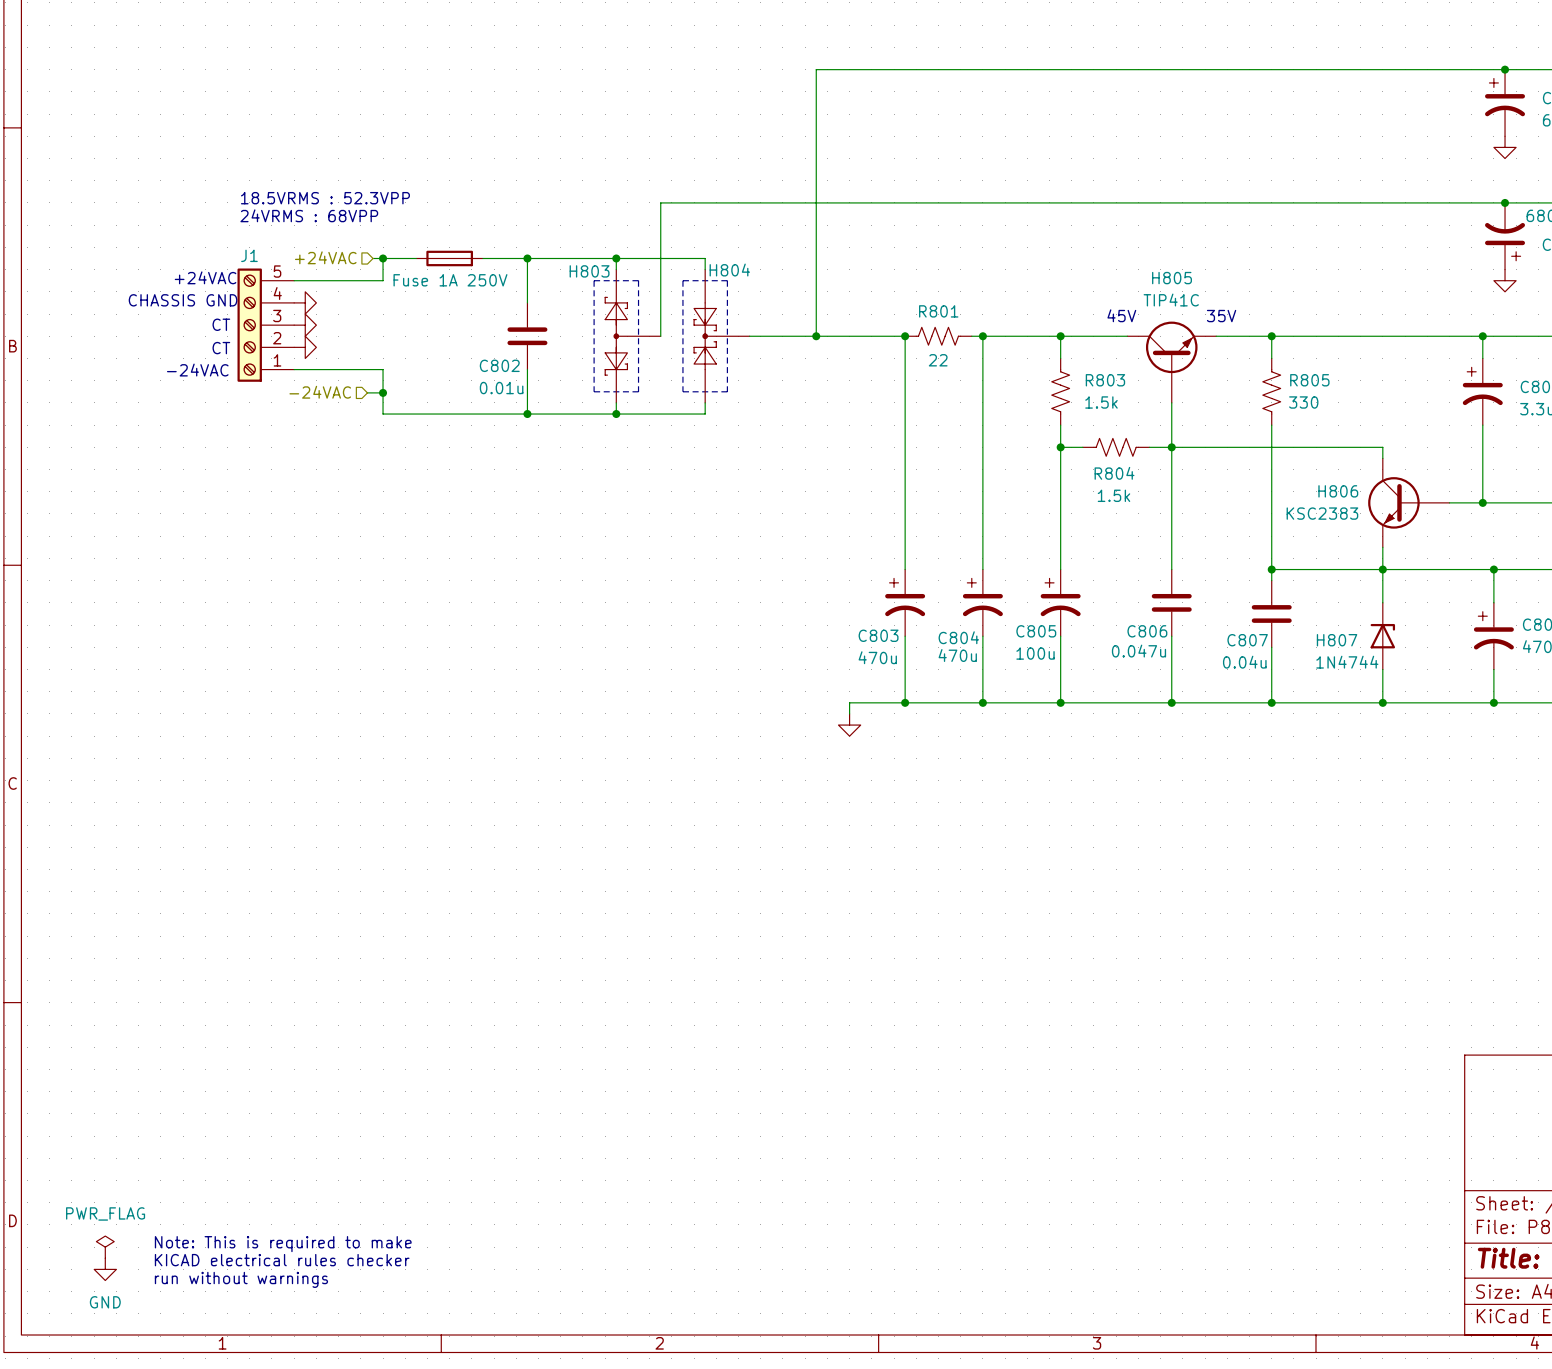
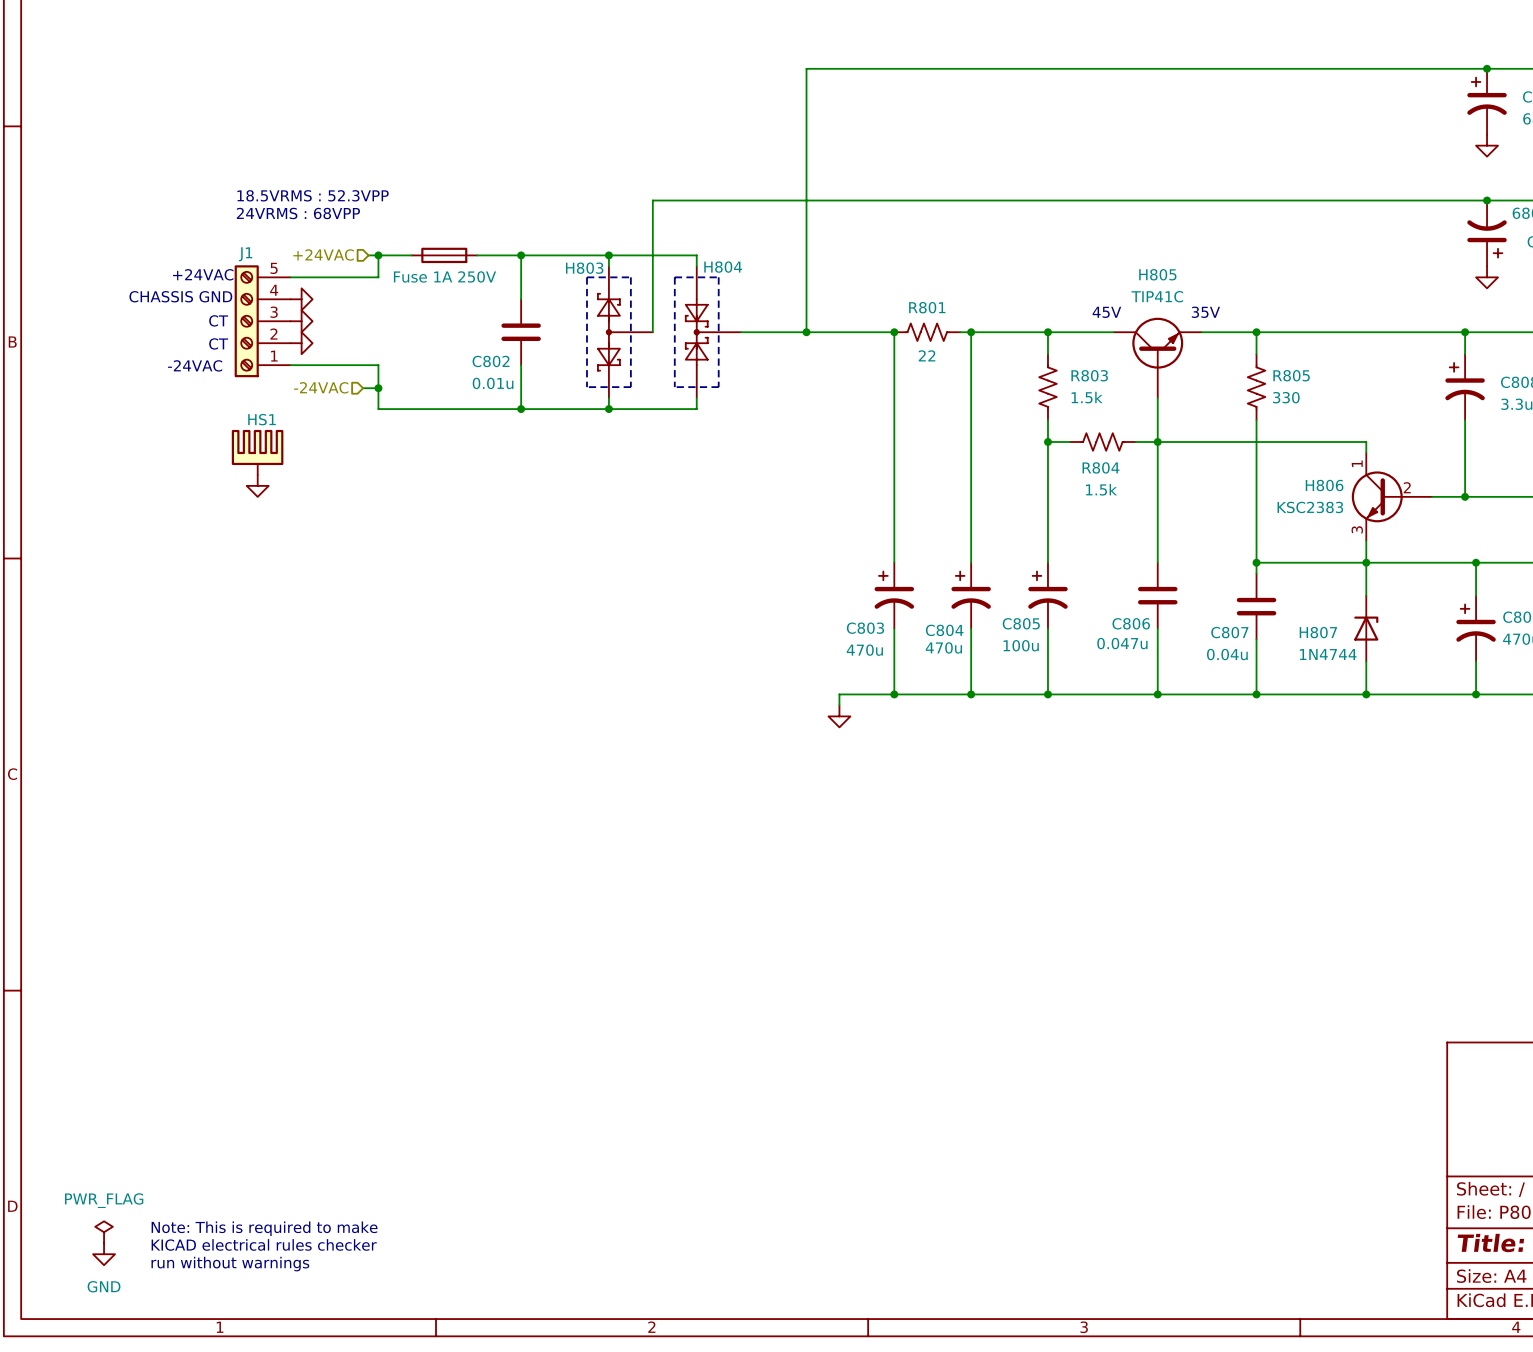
HS1: none -> (257, 452)
H806 pin number: none -> 1 (1357, 463)
power symbol: none -> (257, 485)
H806 pin number: none -> 2 (1407, 487)
H806 pin number: none -> 3 (1357, 529)

